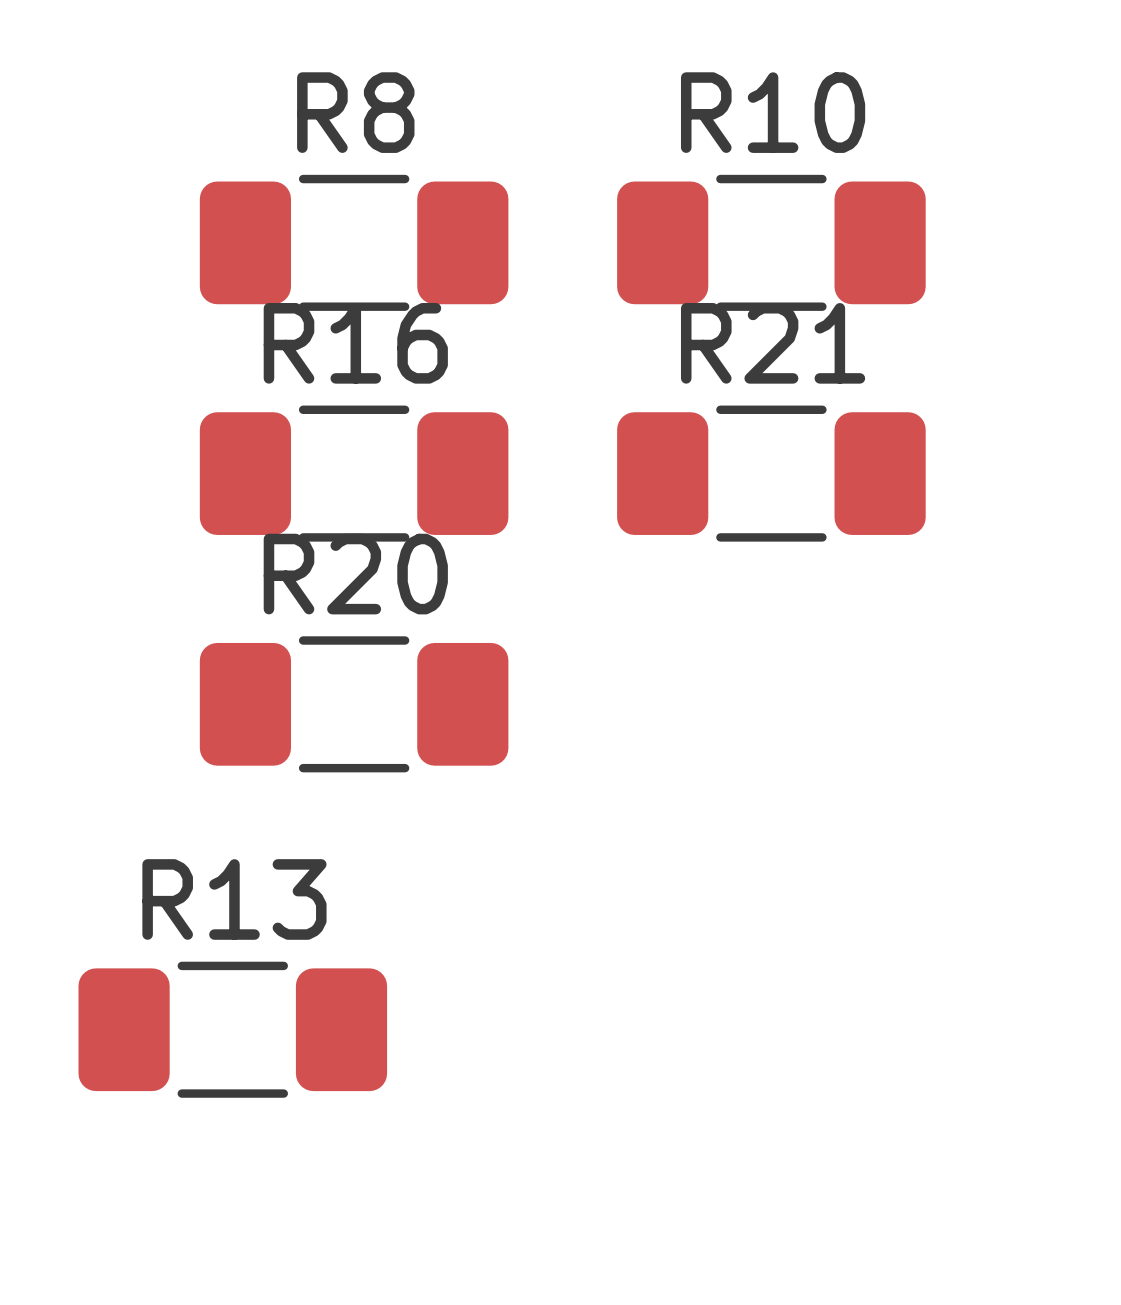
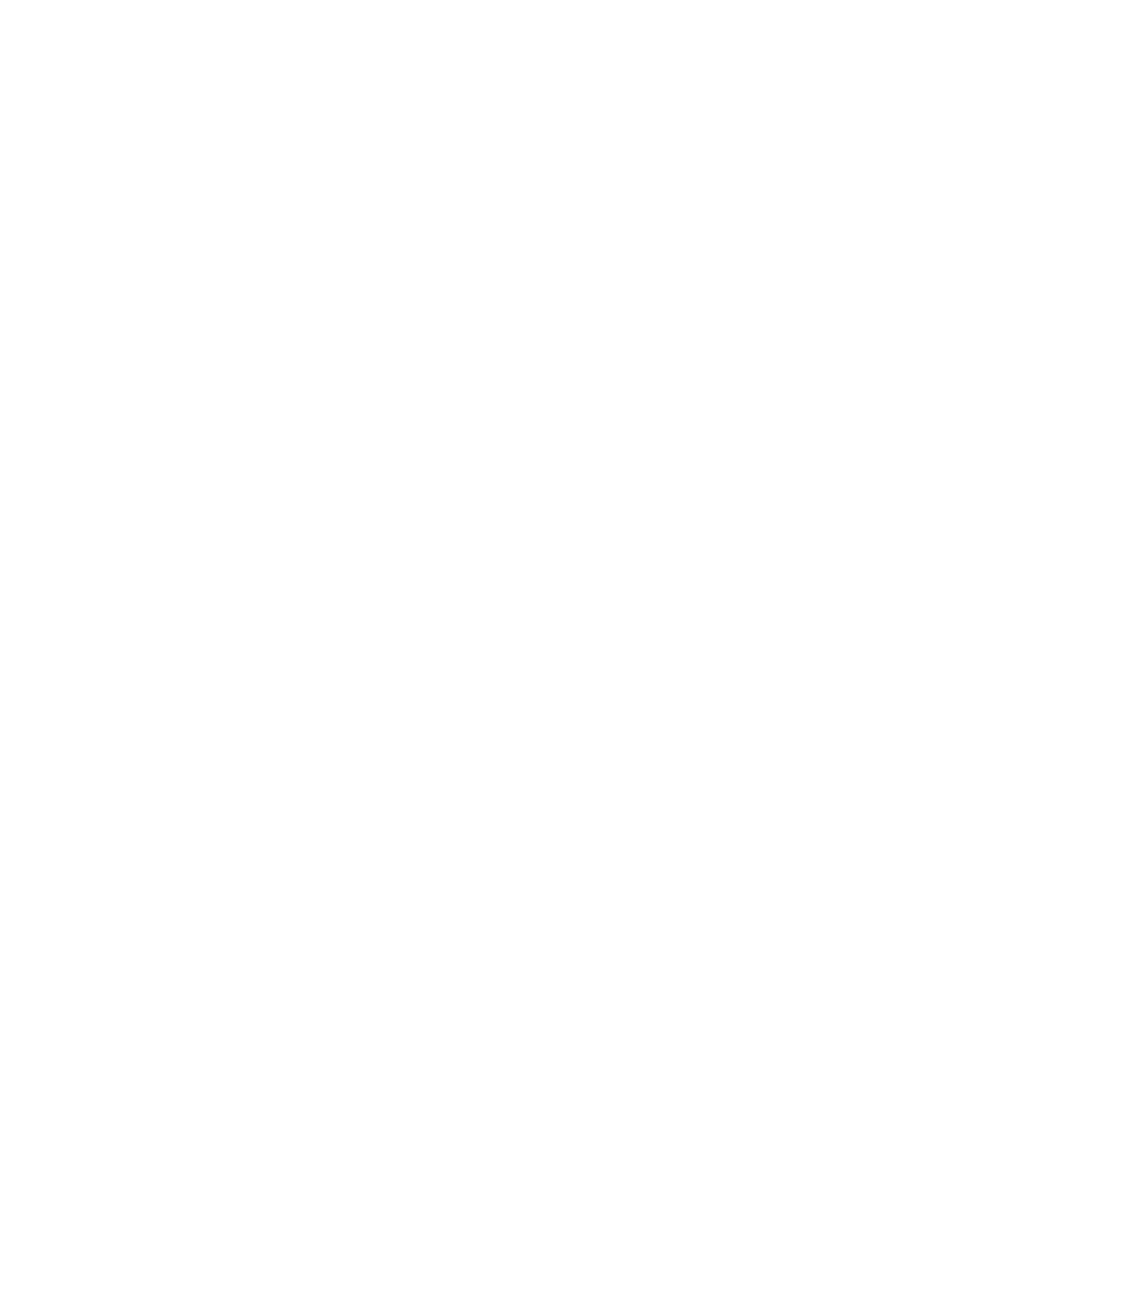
R8: (354, 242) -> none
R10: (771, 242) -> none
R16: (354, 473) -> none
R21: (771, 473) -> none
R20: (354, 704) -> none
R13: (232, 1029) -> none

